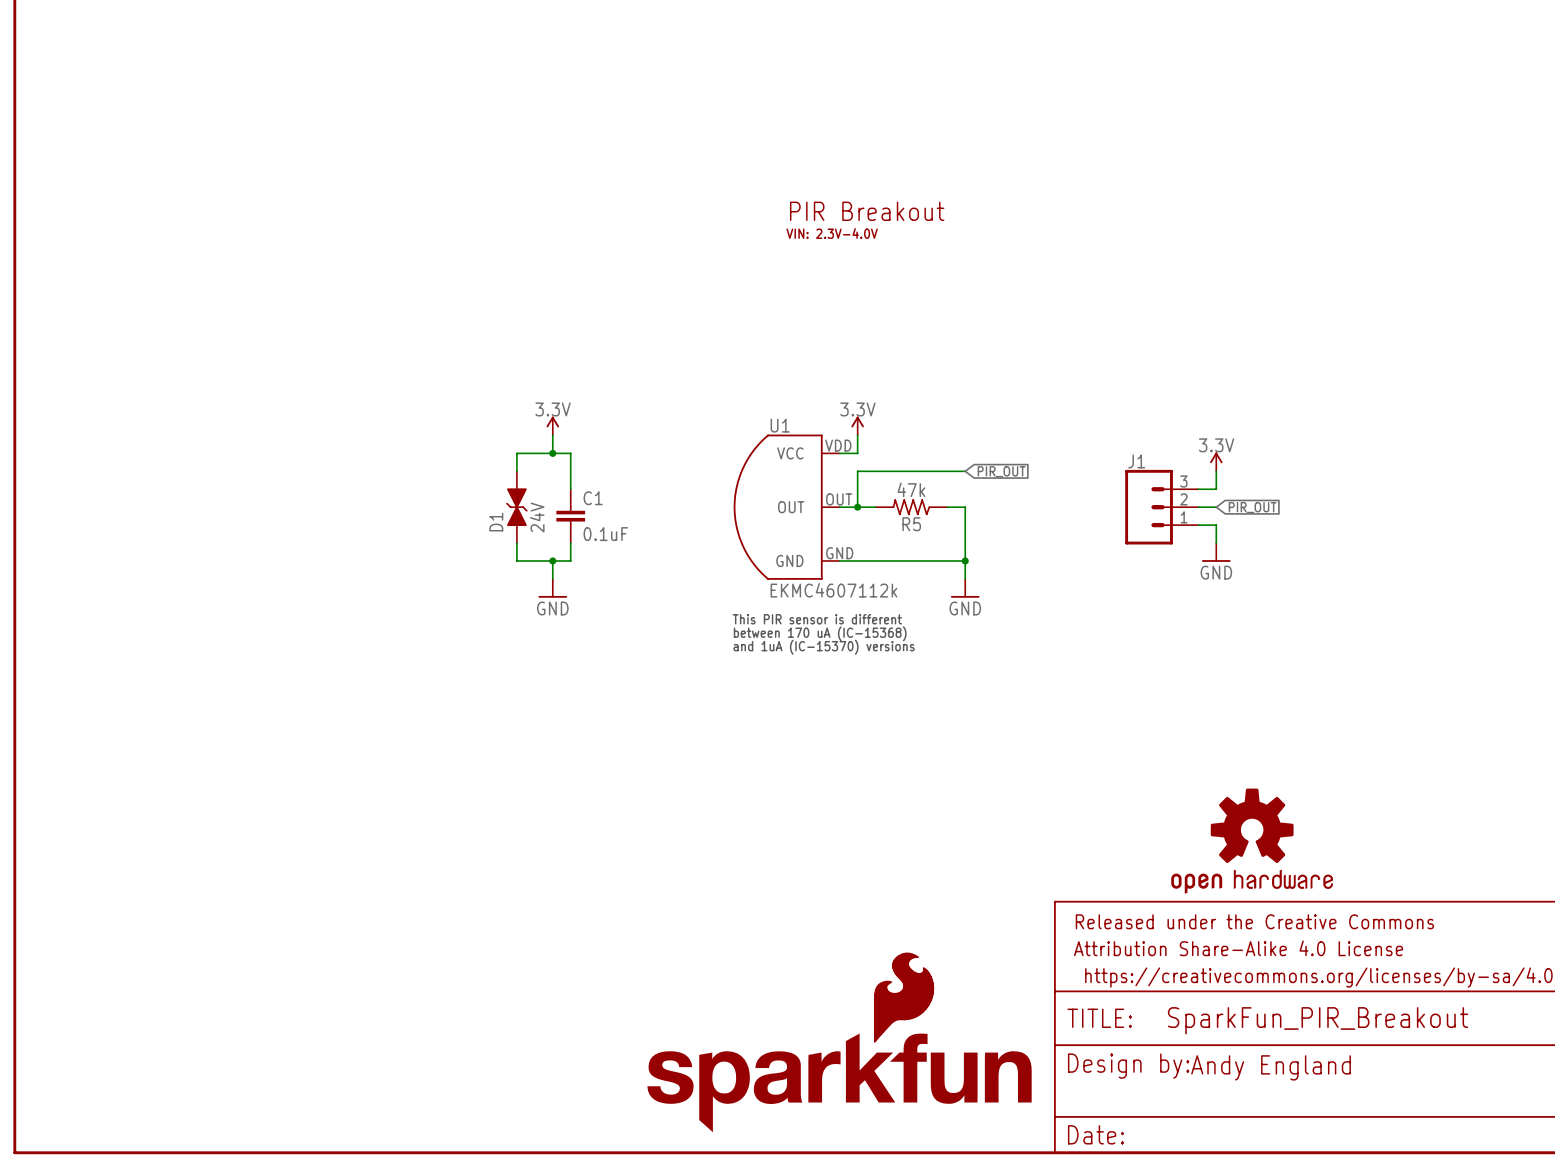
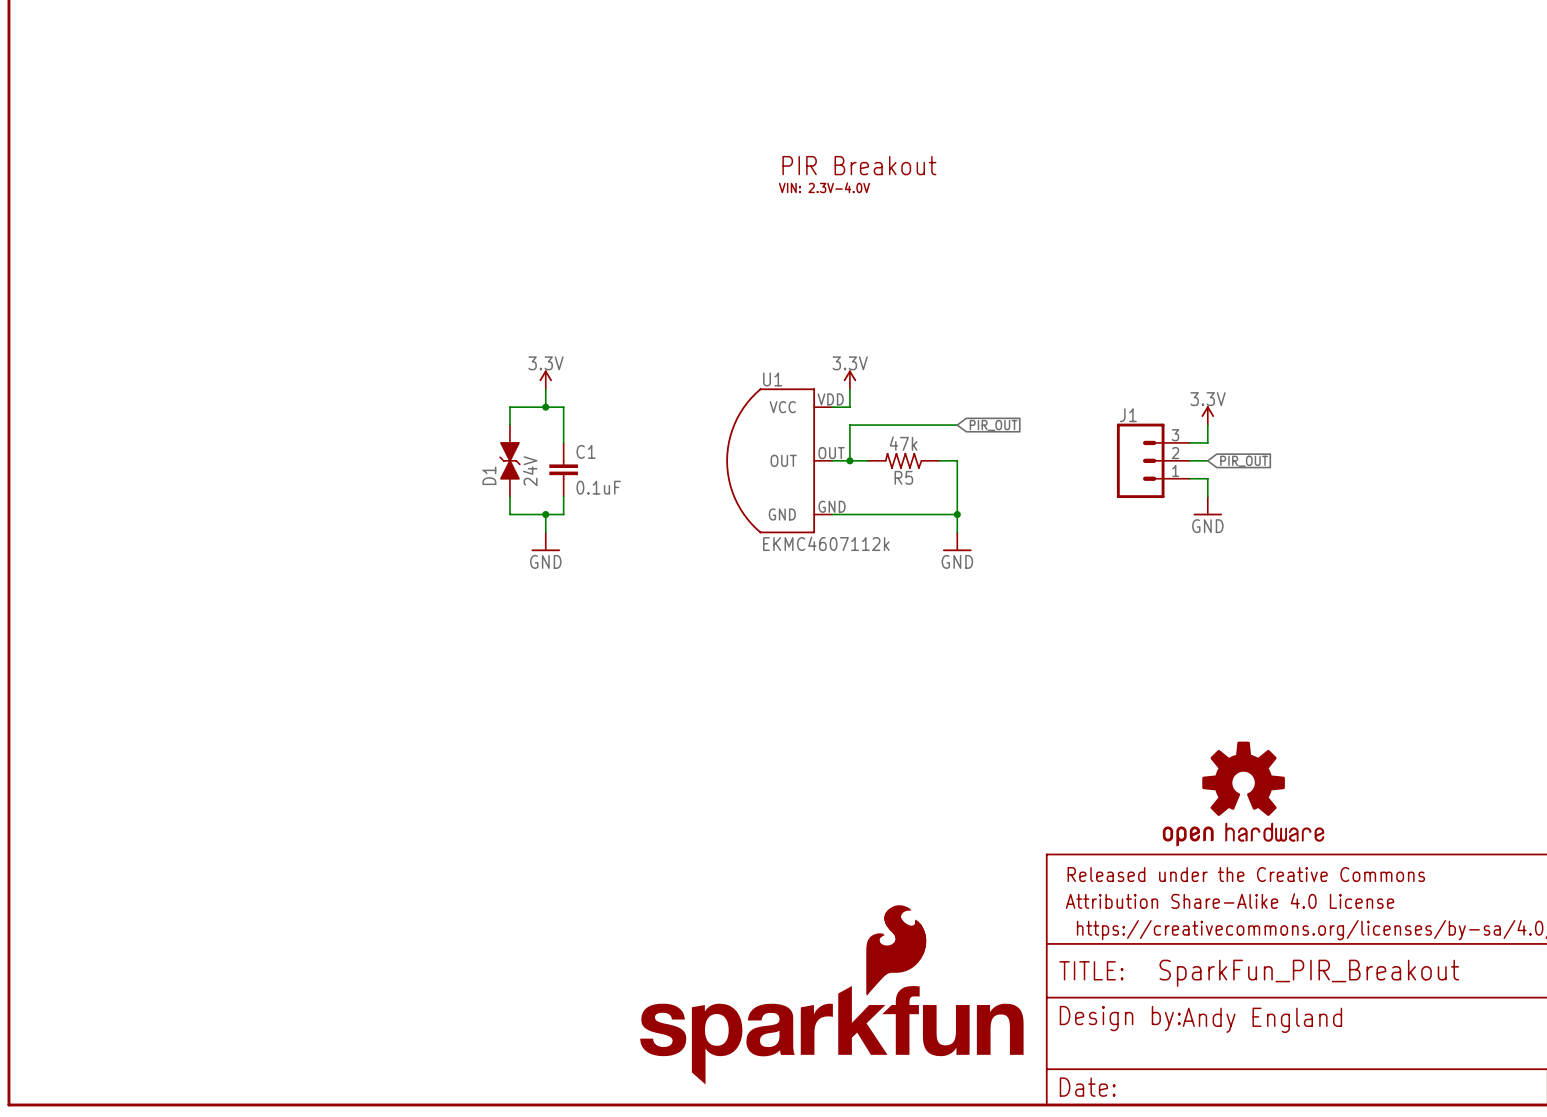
text: This PIR sensor is different (817, 619) -> none
text: between 170 uA (IC-15368) (820, 633) -> none
text: and 1uA (IC-15370) versions (824, 647) -> none

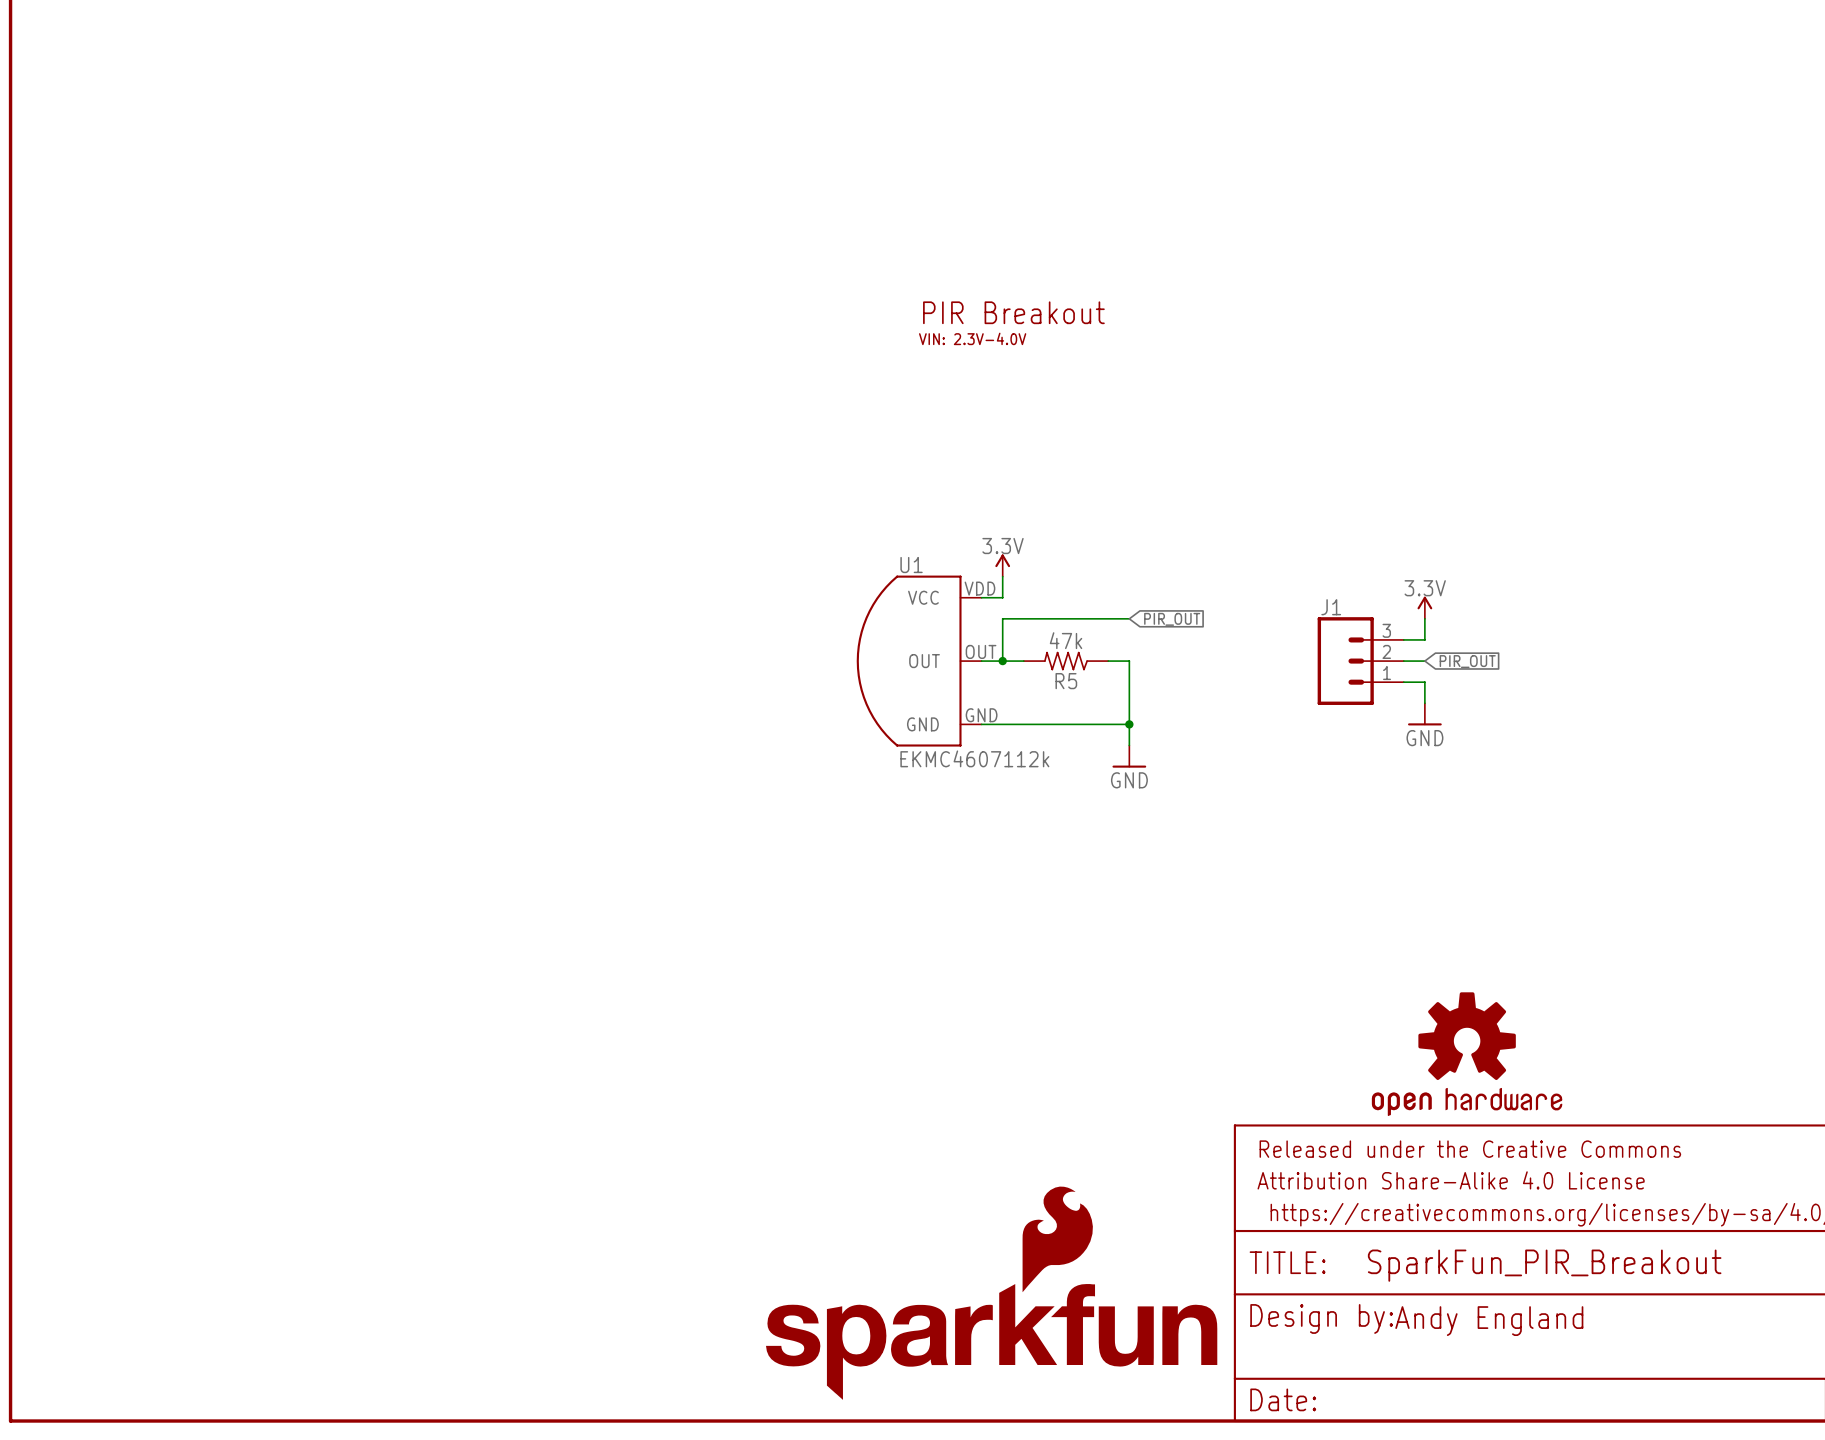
power symbol: 3.3V (545, 379) -> none
wire: (545, 389) (545, 407) -> none
junction: (545, 407) -> none
wire: (509, 425) (509, 407) (563, 407) (563, 442) -> none
D1: 24V (509, 460) -> none
C1: 0.1uF (563, 469) -> none
wire: (509, 496) (509, 514) (563, 514) (563, 496) -> none
wire: (545, 514) (545, 532) -> none
junction: (545, 514) -> none
power symbol: GND (545, 541) -> none
part: (831, 994) -> none
part: none -> (991, 1341)

